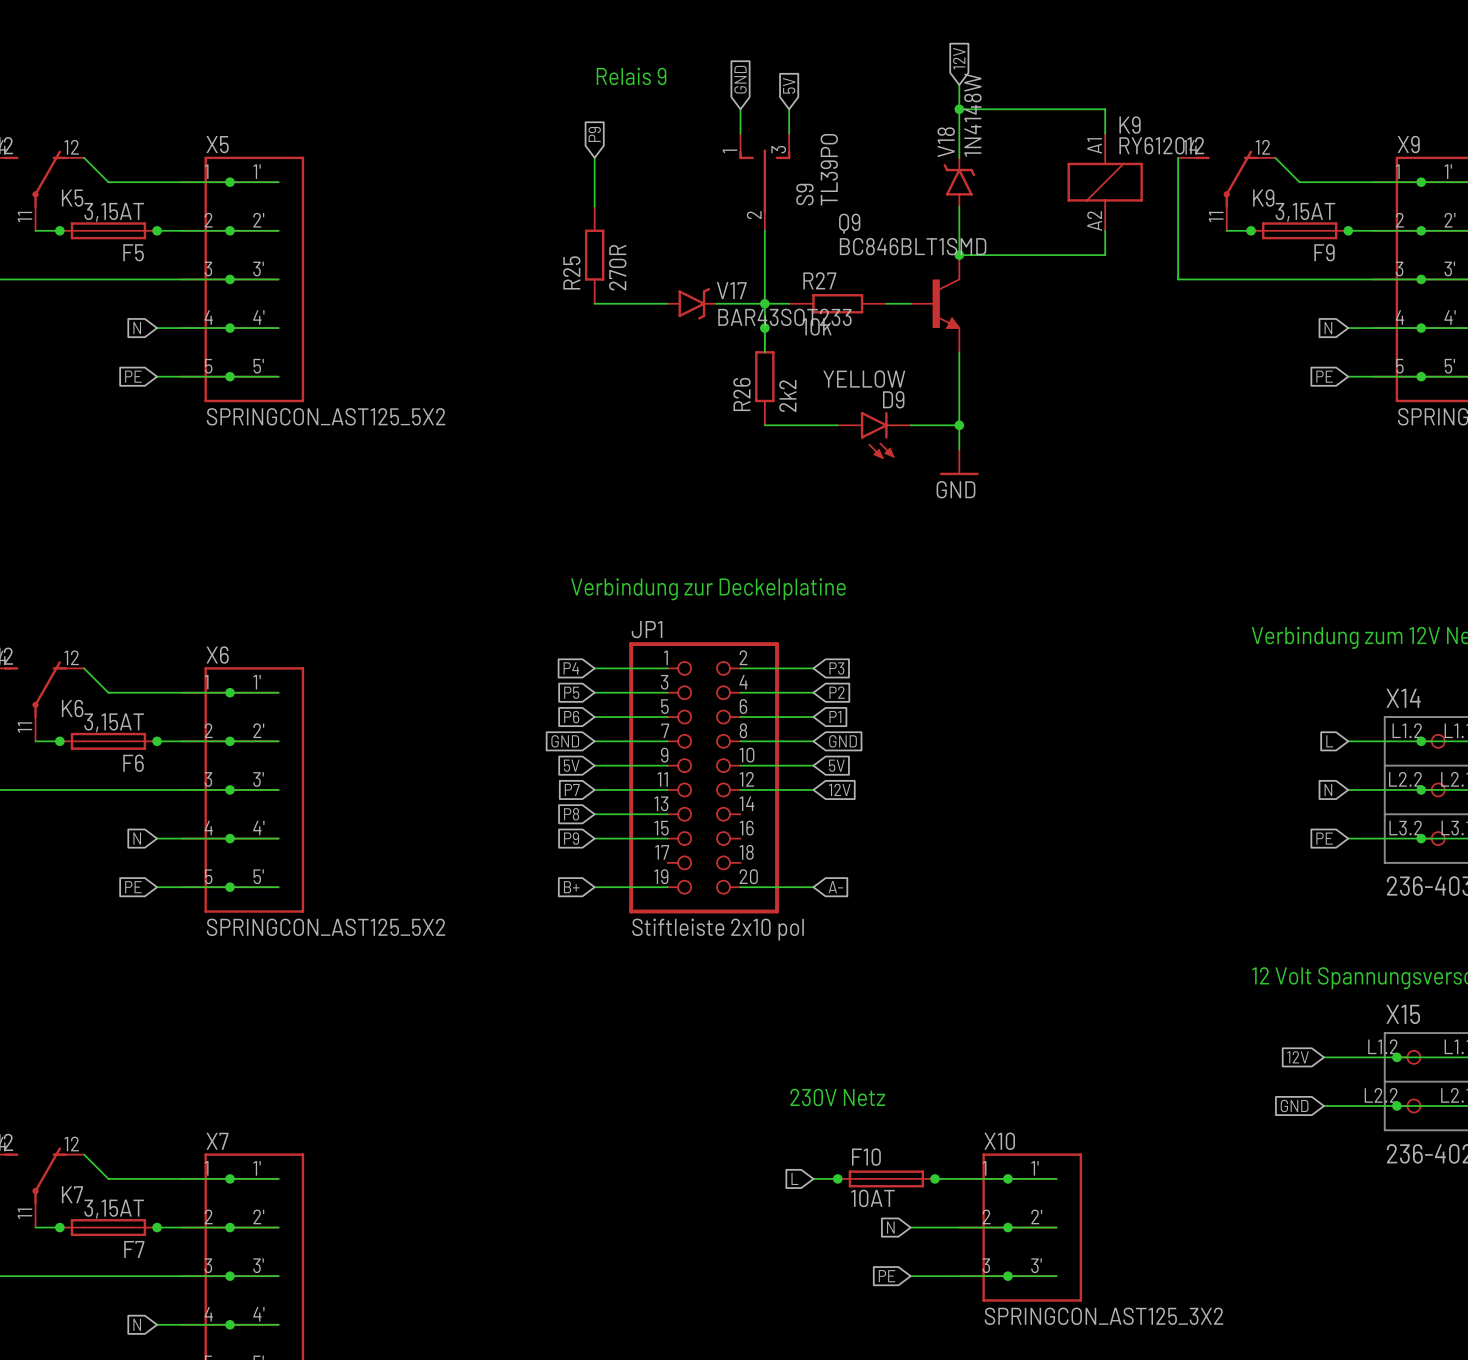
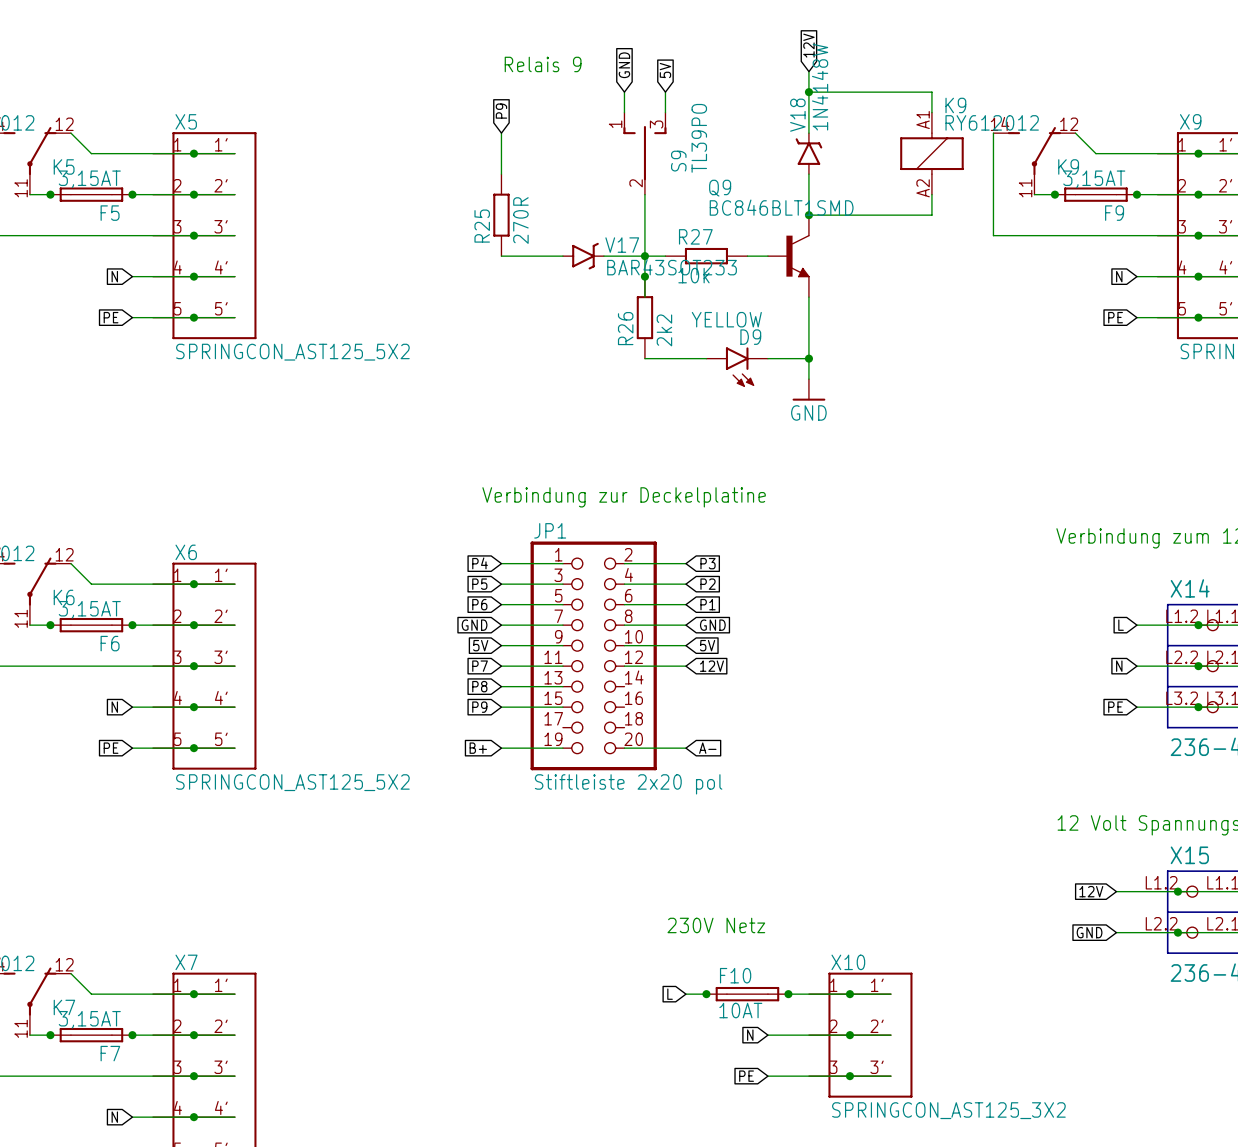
JP1 value: Stiftleiste 2x10 pol (718, 929) -> Stiftleiste 2x20 pol (628, 784)

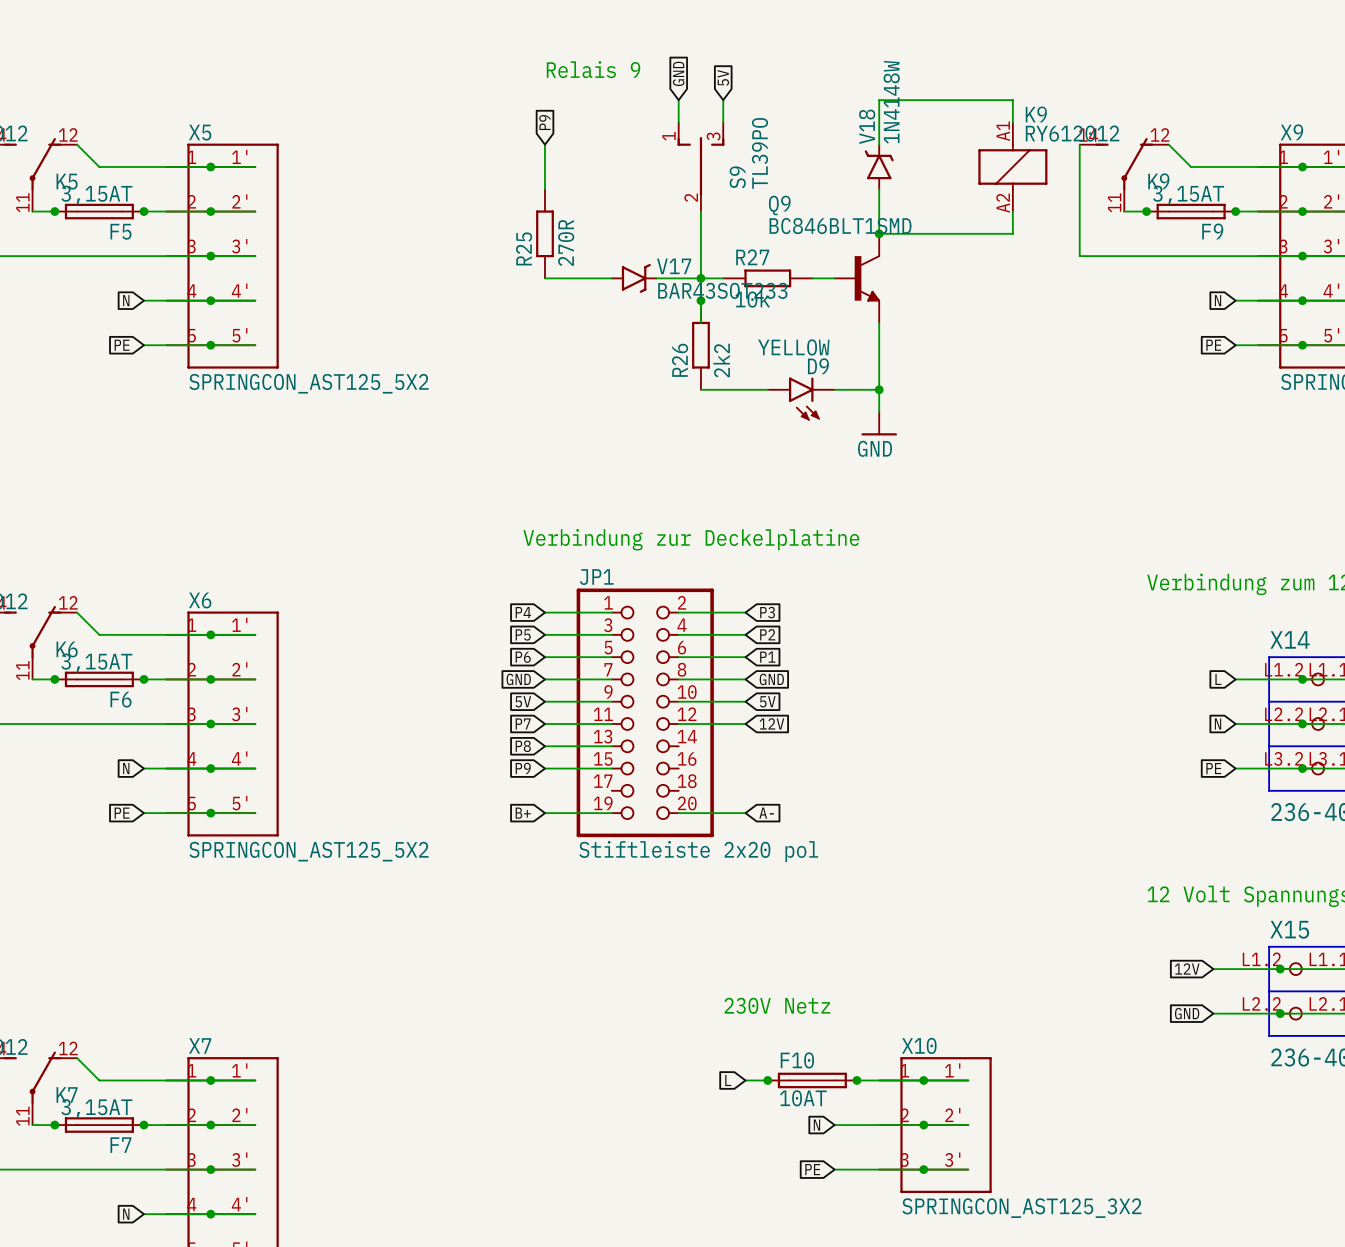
global label: 12V (808, 45) -> none
wire: (808, 71) (808, 92) -> none
junction: (808, 92) -> none

